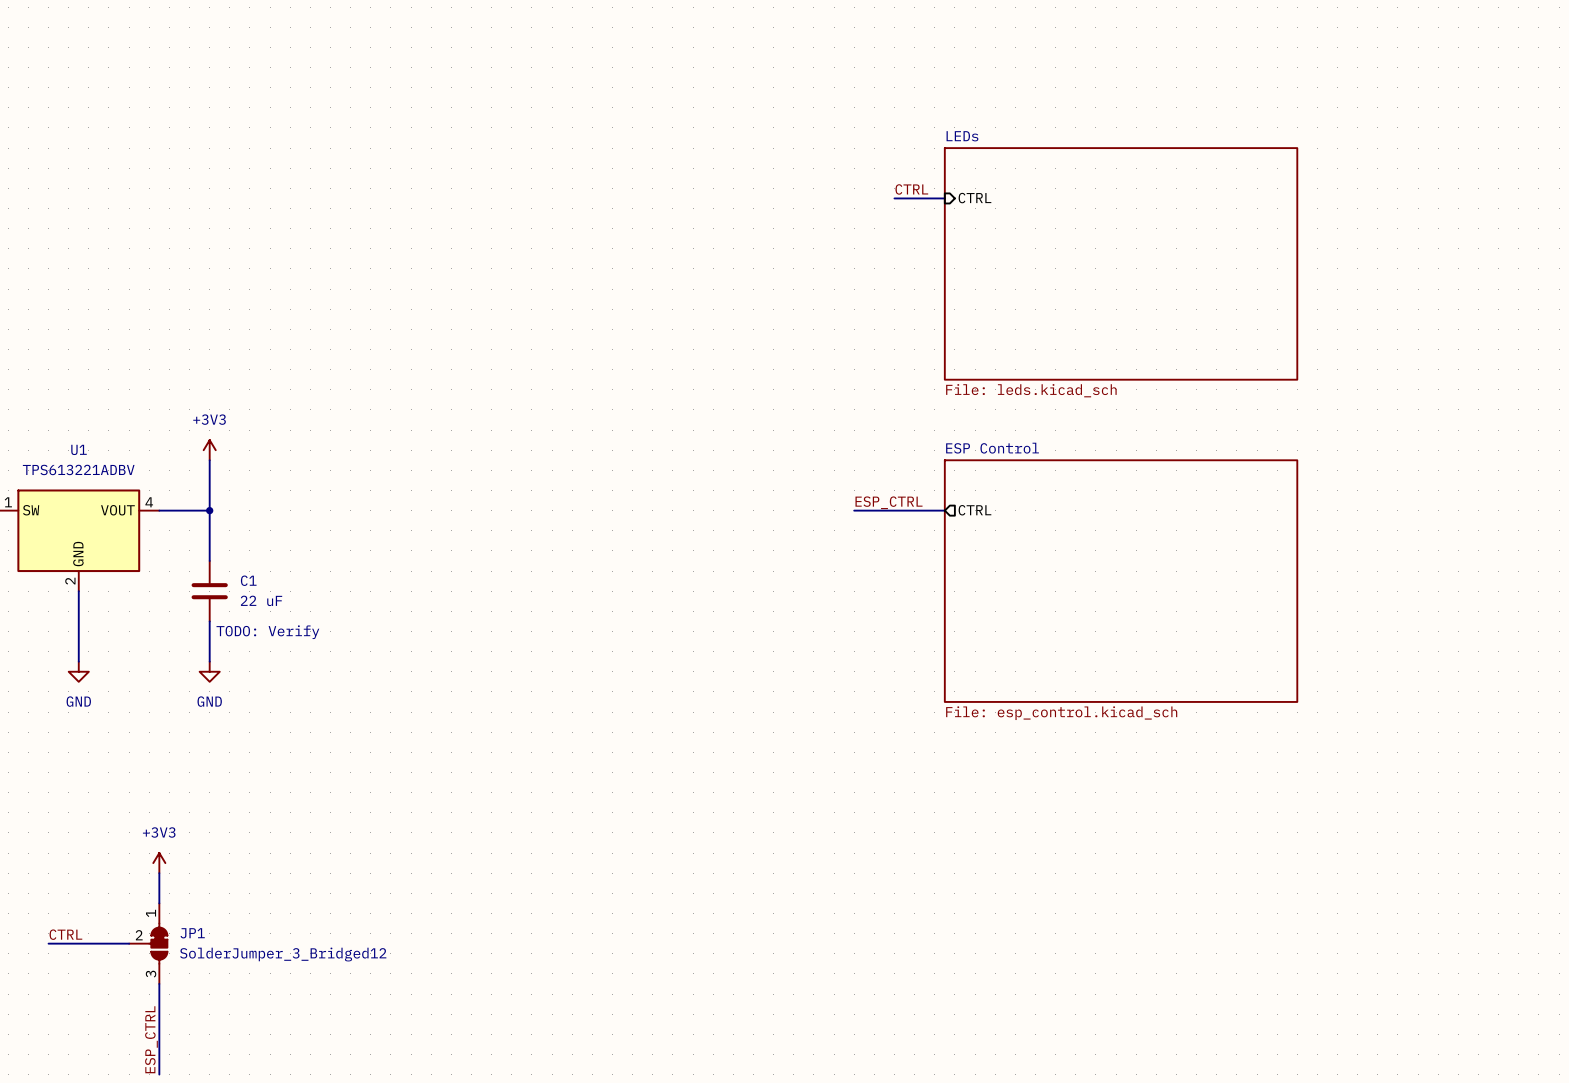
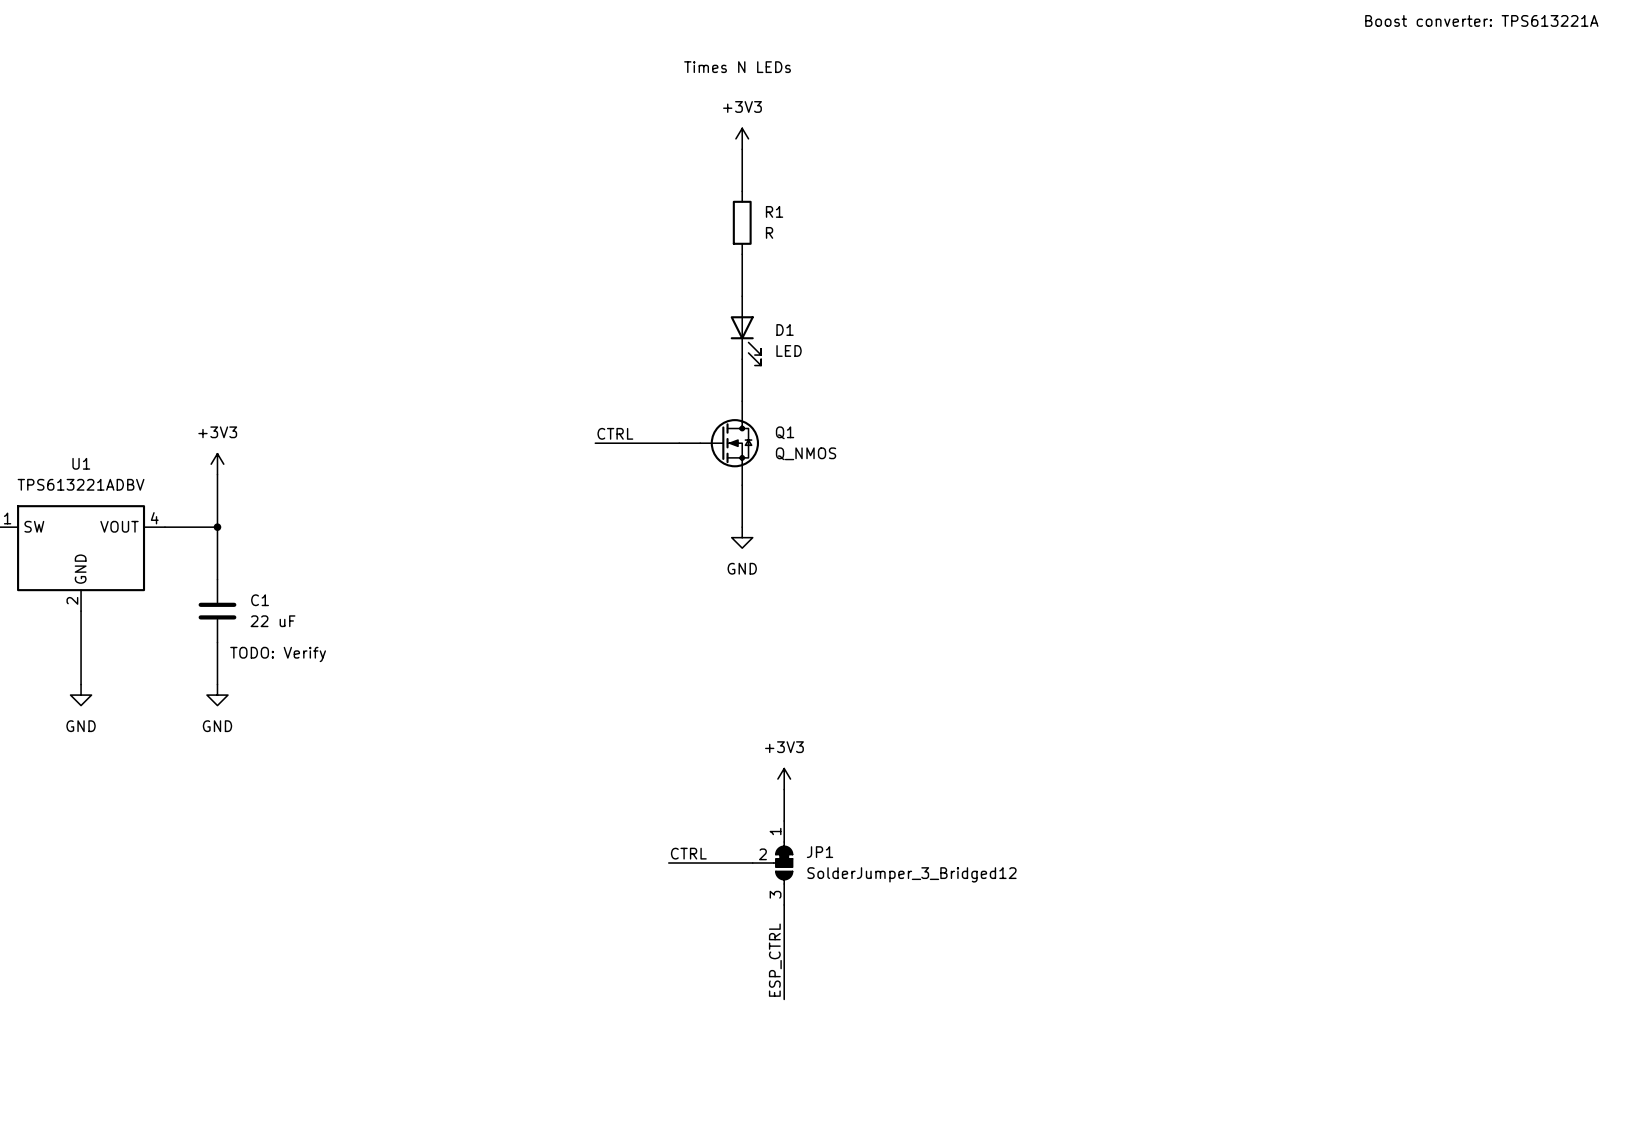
text: none -> Boost converter: TPS613221A (1481, 20)
text: none -> Times N LEDs (737, 67)
power symbol: none -> +3V3 (742, 138)
wire: none -> (742, 149) (742, 191)
label: CTRL (911, 189) -> none
wire: (894, 198) (944, 198) -> none
sheet pin: CTRL (974, 198) -> none
R1: none -> R (742, 222)
wire: none -> (742, 254) (742, 296)
sheet LEDs: File: leds.kicad_sch (1121, 263) -> none
D1: none -> LED (745, 330)
wire: none -> (742, 359) (742, 401)
label: none -> CTRL (615, 433)
wire: none -> (595, 443) (679, 443)
Q1: none -> Q_NMOS (719, 443)
wire: none -> (742, 485) (742, 527)
label: ESP_CTRL (889, 502) -> none
wire: (854, 510) (944, 510) -> none
sheet pin: CTRL (974, 510) -> none
power symbol: none -> GND (742, 537)
sheet ESP Control: File: esp_control.kicad_sch (1121, 581) -> none
power symbol: none -> +3V3 (784, 779)
wire: none -> (784, 789) (784, 821)
label: none -> CTRL (688, 853)
wire: none -> (668, 863) (752, 863)
power symbol: +3V3 (159, 863) -> none
wire: (159, 873) (159, 903) -> none
wire: none -> (784, 904) (784, 999)
label: none -> ESP_CTRL (775, 960)
label: CTRL (65, 934) -> none
wire: (48, 943) (129, 943) -> none
JP1 position: (148, 943) -> (772, 863)
wire: (159, 983) (159, 1074) -> none
label: ESP_CTRL (151, 1039) -> none

